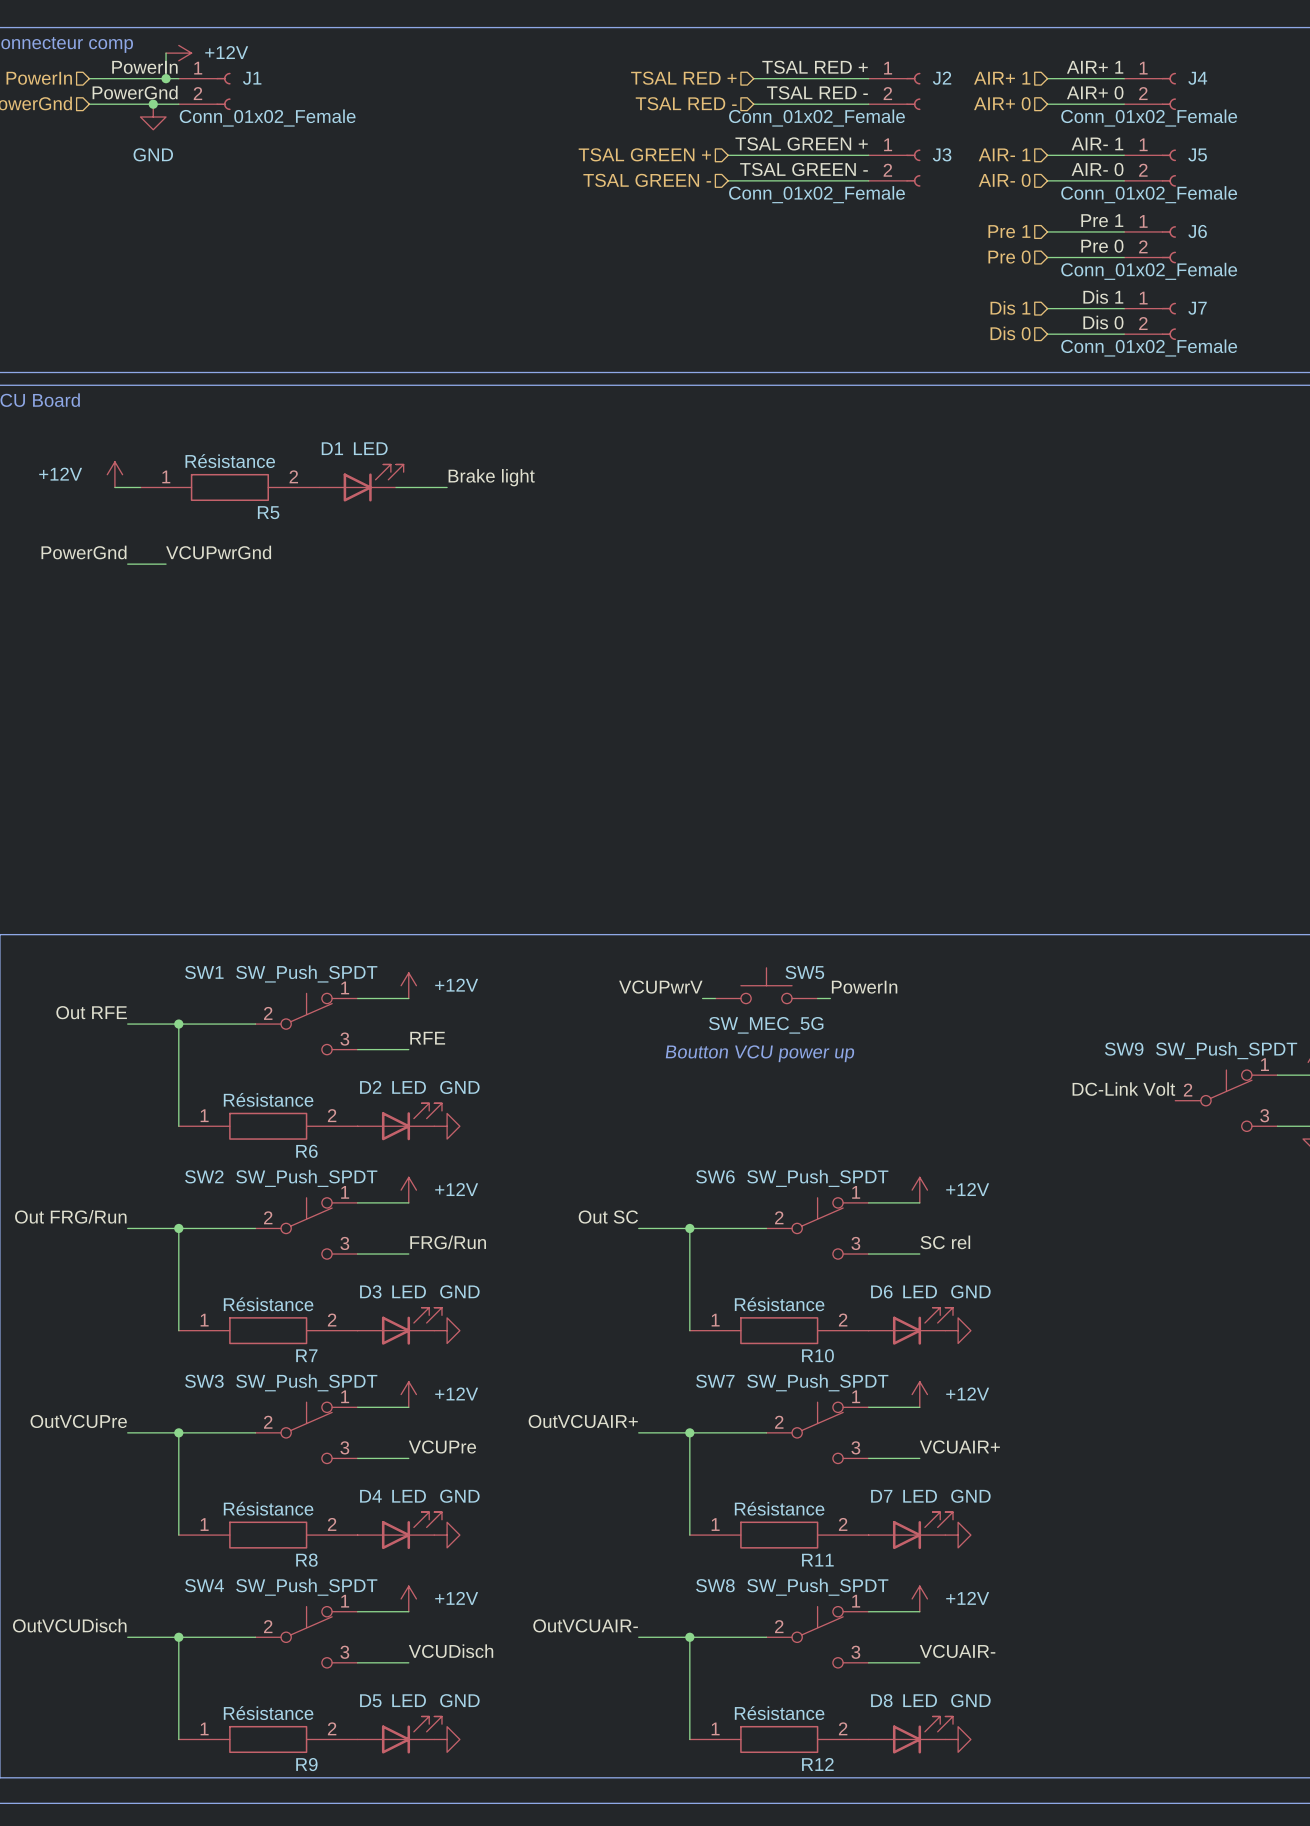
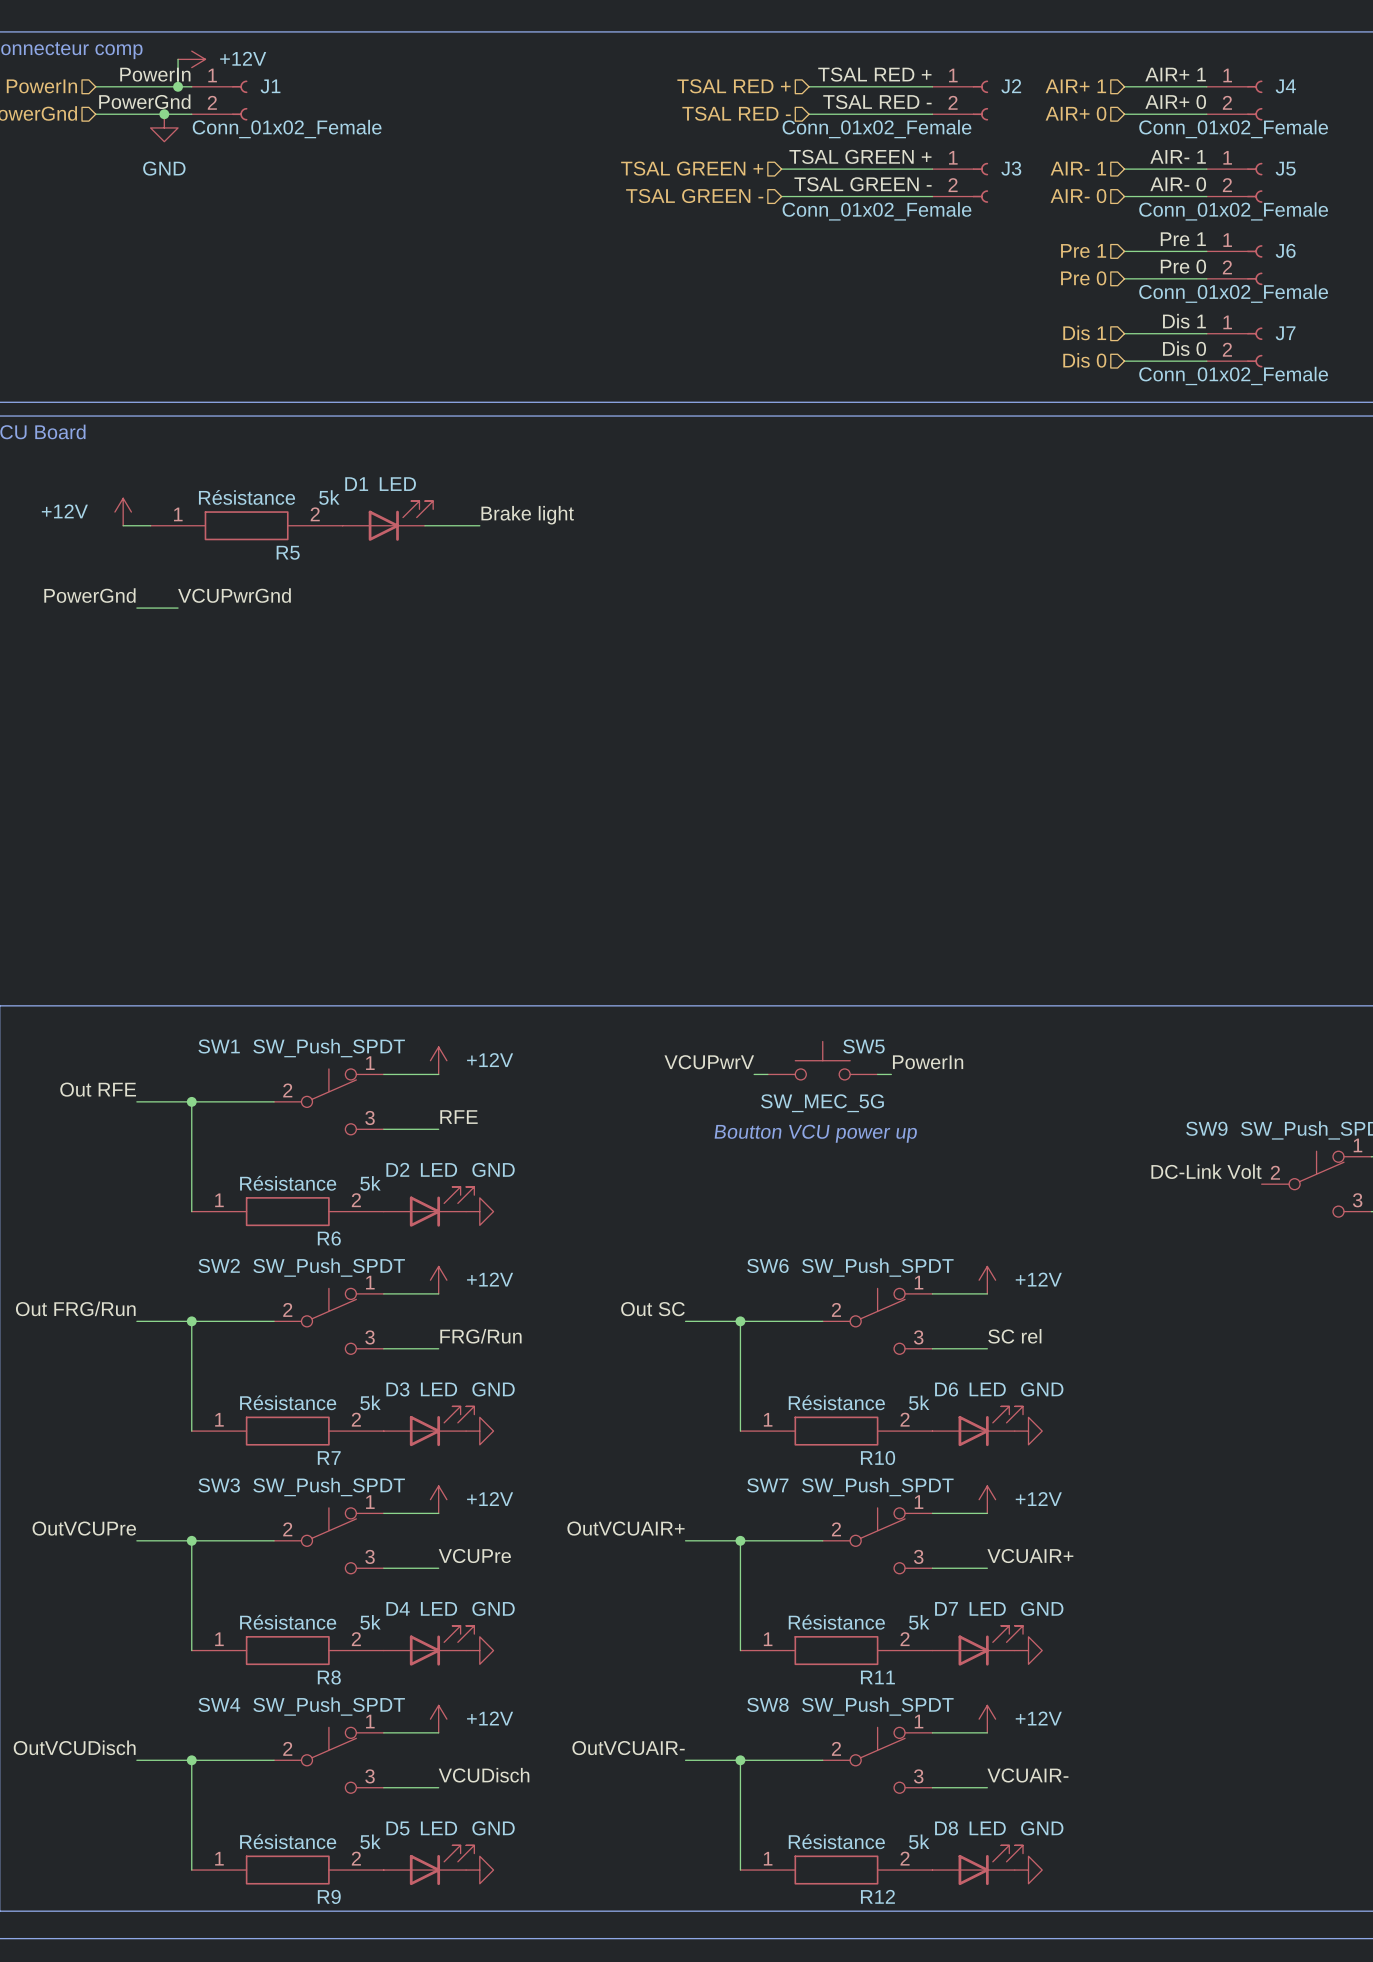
R5 text: none -> 5k (329, 497)
R6 text: none -> 5k (370, 1183)
R7 text: none -> 5k (370, 1402)
R10 text: none -> 5k (919, 1402)
R8 text: none -> 5k (370, 1622)
R11 text: none -> 5k (919, 1622)
R9 text: none -> 5k (370, 1841)
R12 text: none -> 5k (919, 1841)

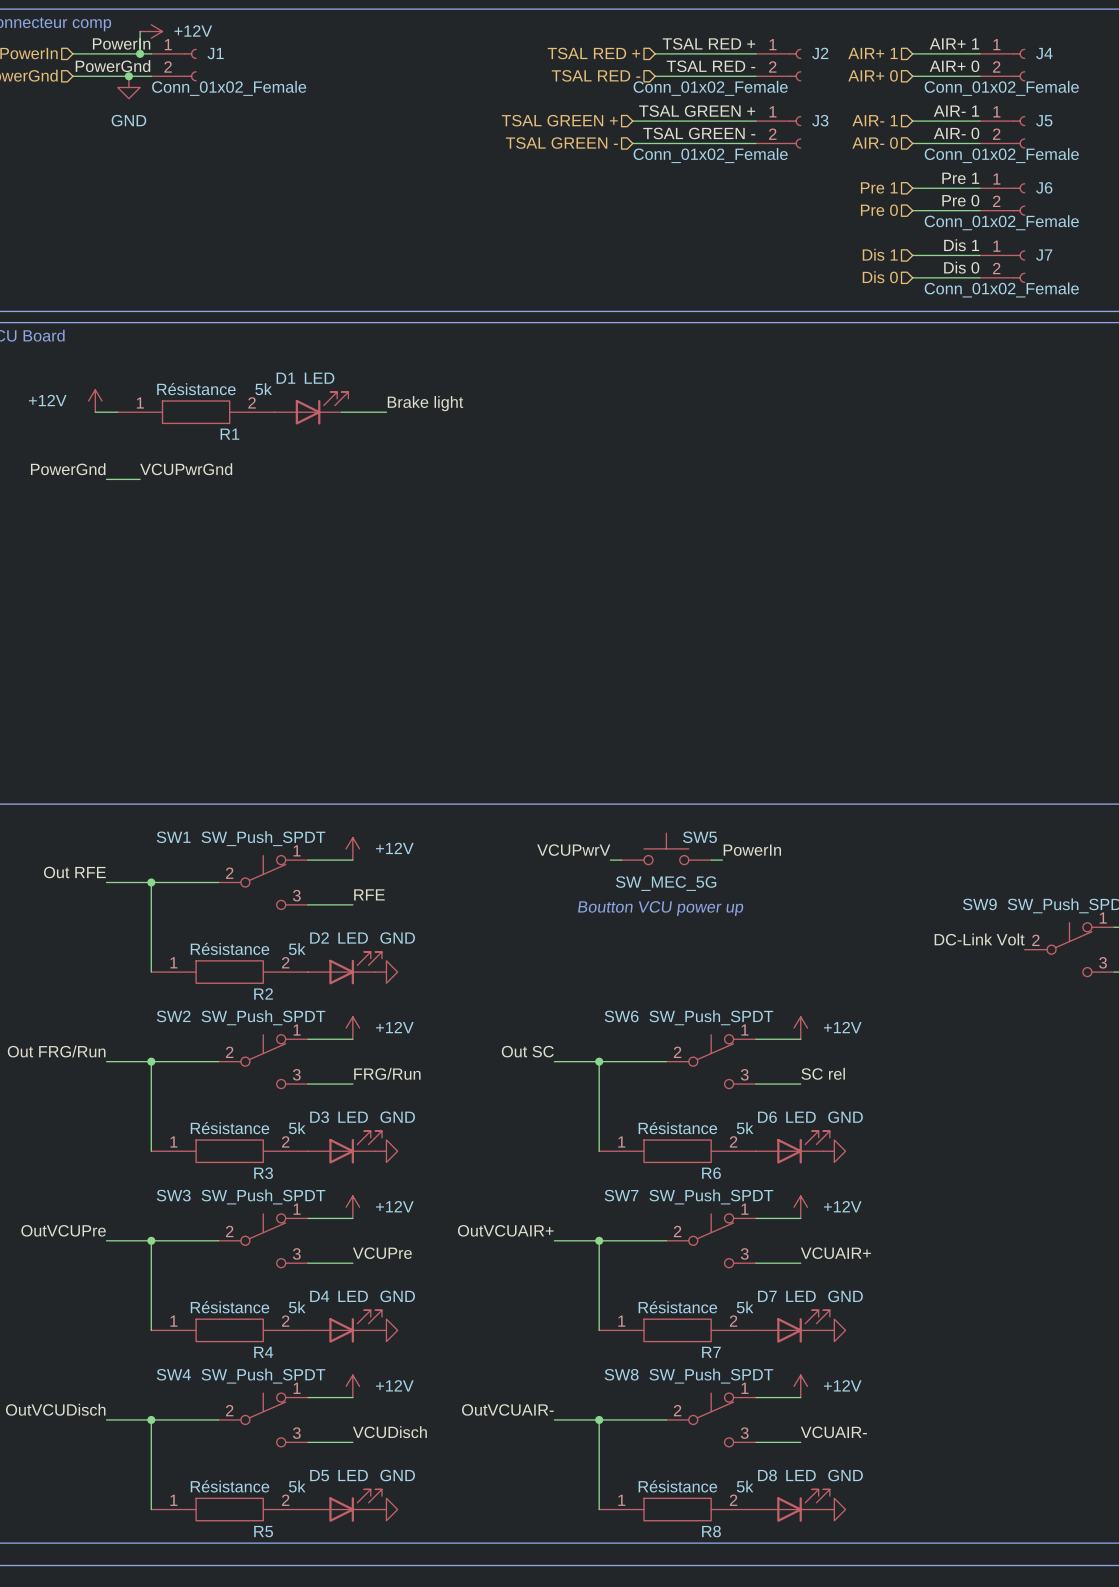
R5 name: R5 (288, 552) -> R1 (229, 434)
R6 name: R6 (329, 1238) -> R2 (263, 993)
R7 name: R7 (329, 1458) -> R3 (263, 1173)
R10 name: R10 (878, 1458) -> R6 (711, 1173)
R8 name: R8 (329, 1677) -> R4 (263, 1352)
R11 name: R11 (877, 1677) -> R7 (711, 1352)
R9 name: R9 (329, 1896) -> R5 (263, 1531)
R12 name: R12 (877, 1896) -> R8 (711, 1531)

